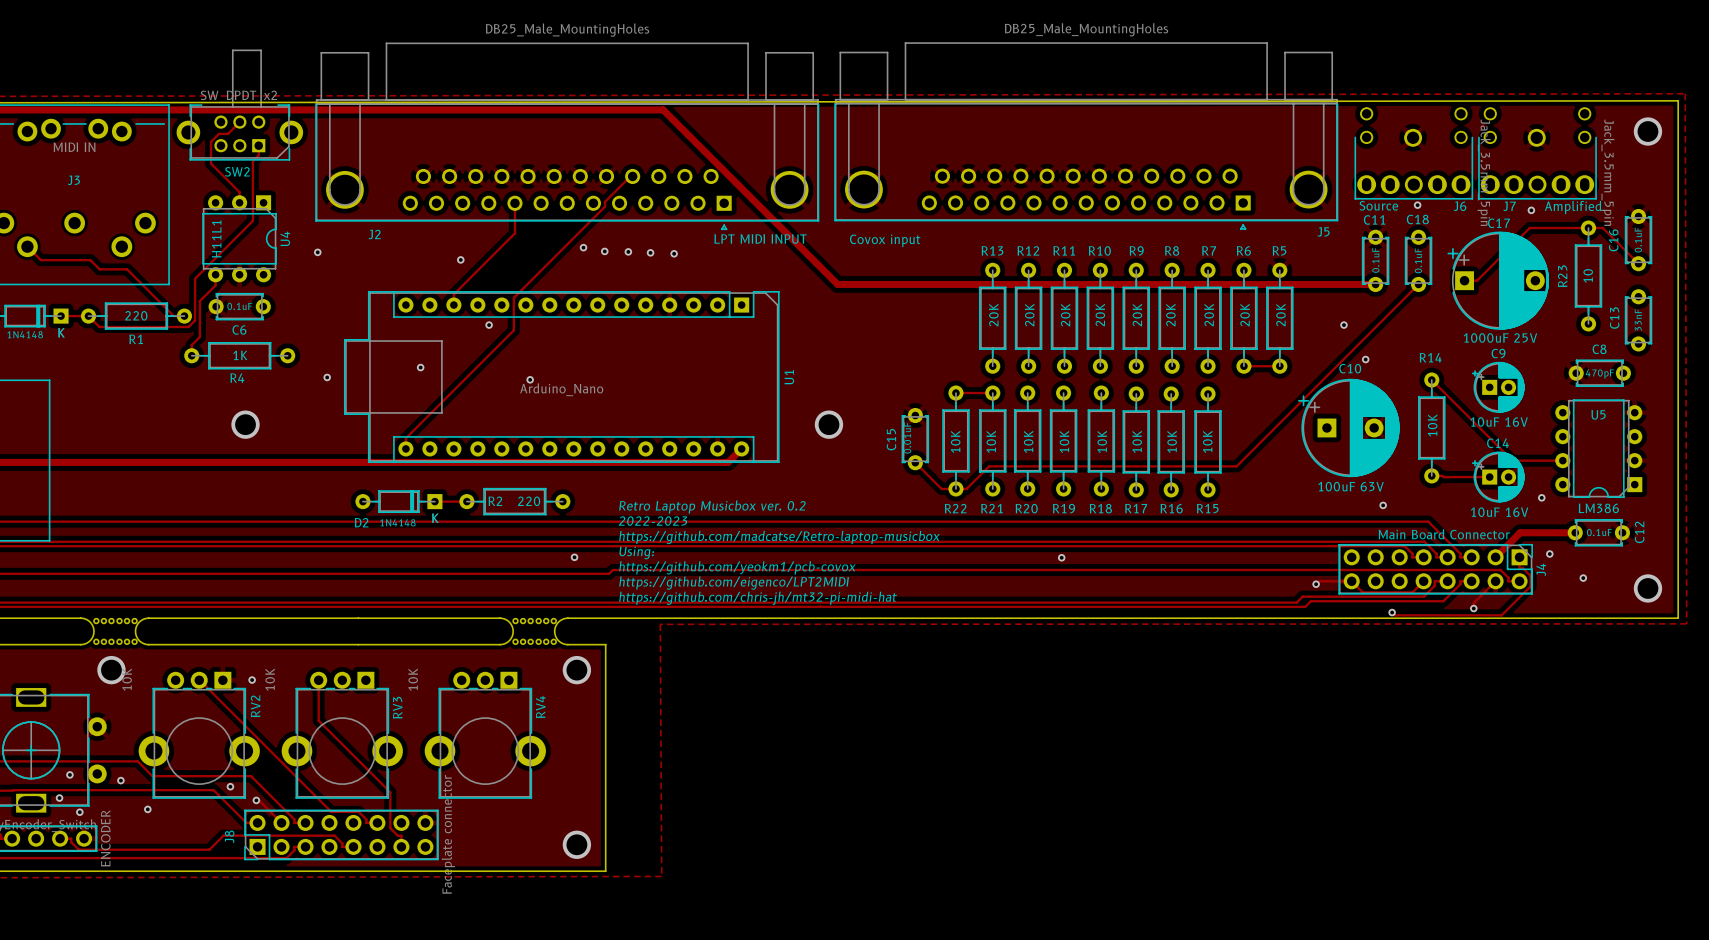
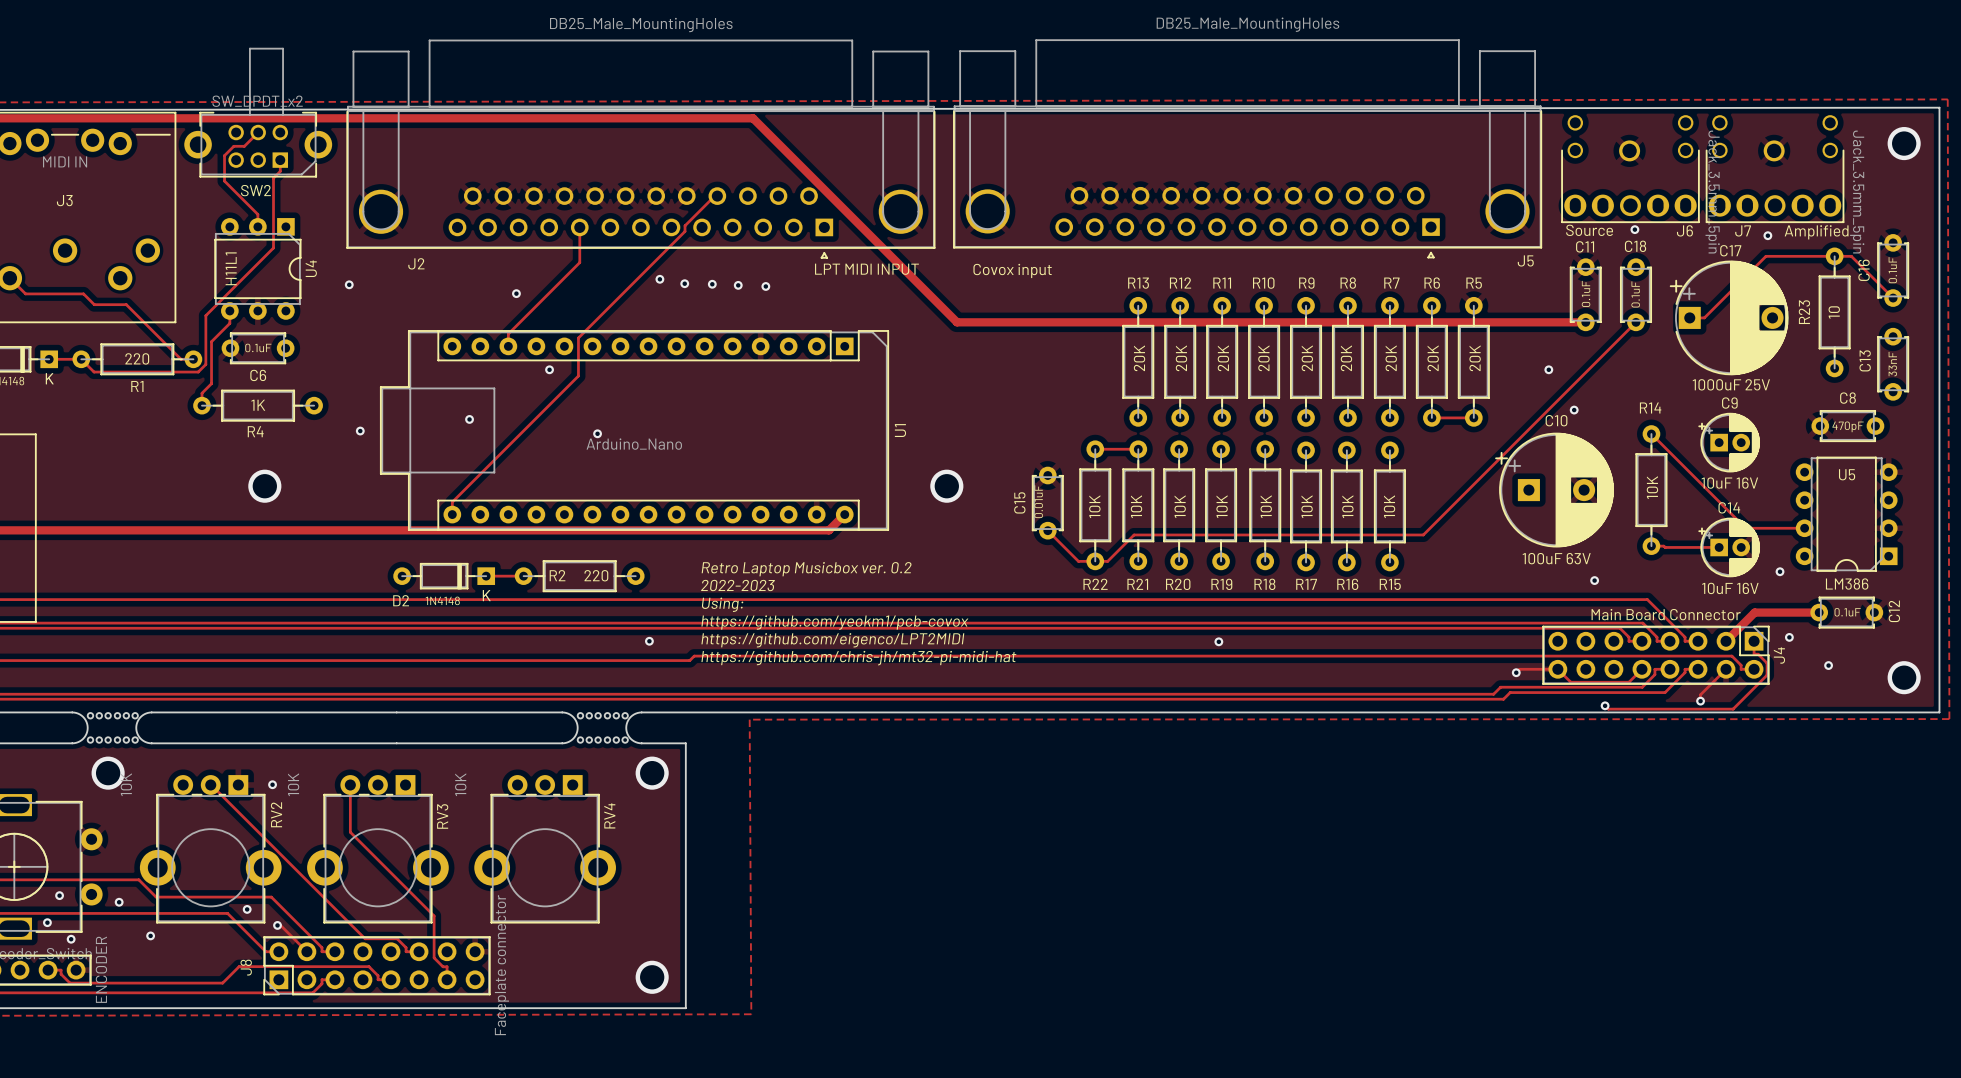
text: none -> Retro Laptop Musicbox ver. 0.2 (806, 569)
text: Retro Laptop Musicbox ver. 0.2 (712, 507) -> 2022-2023 (737, 585)
text: 2022-2023 (653, 521) -> Using: (722, 604)
text: https://github.com/madcatse/Retro-laptop-musicbox (779, 537) -> https://github.com/yeokm1/pcb-covox (834, 622)
text: Using: (636, 552) -> https://github.com/eigenco/LPT2MIDI (832, 640)
text: https://github.com/yeokm1/pcb-covox (737, 567) -> https://github.com/chris-jh/mt32-pi-midi-hat (858, 658)
text: https://github.com/eigenco/LPT2MIDI (734, 583) -> none
text: https://github.com/chris-jh/mt32-pi-midi-hat (758, 598) -> none

